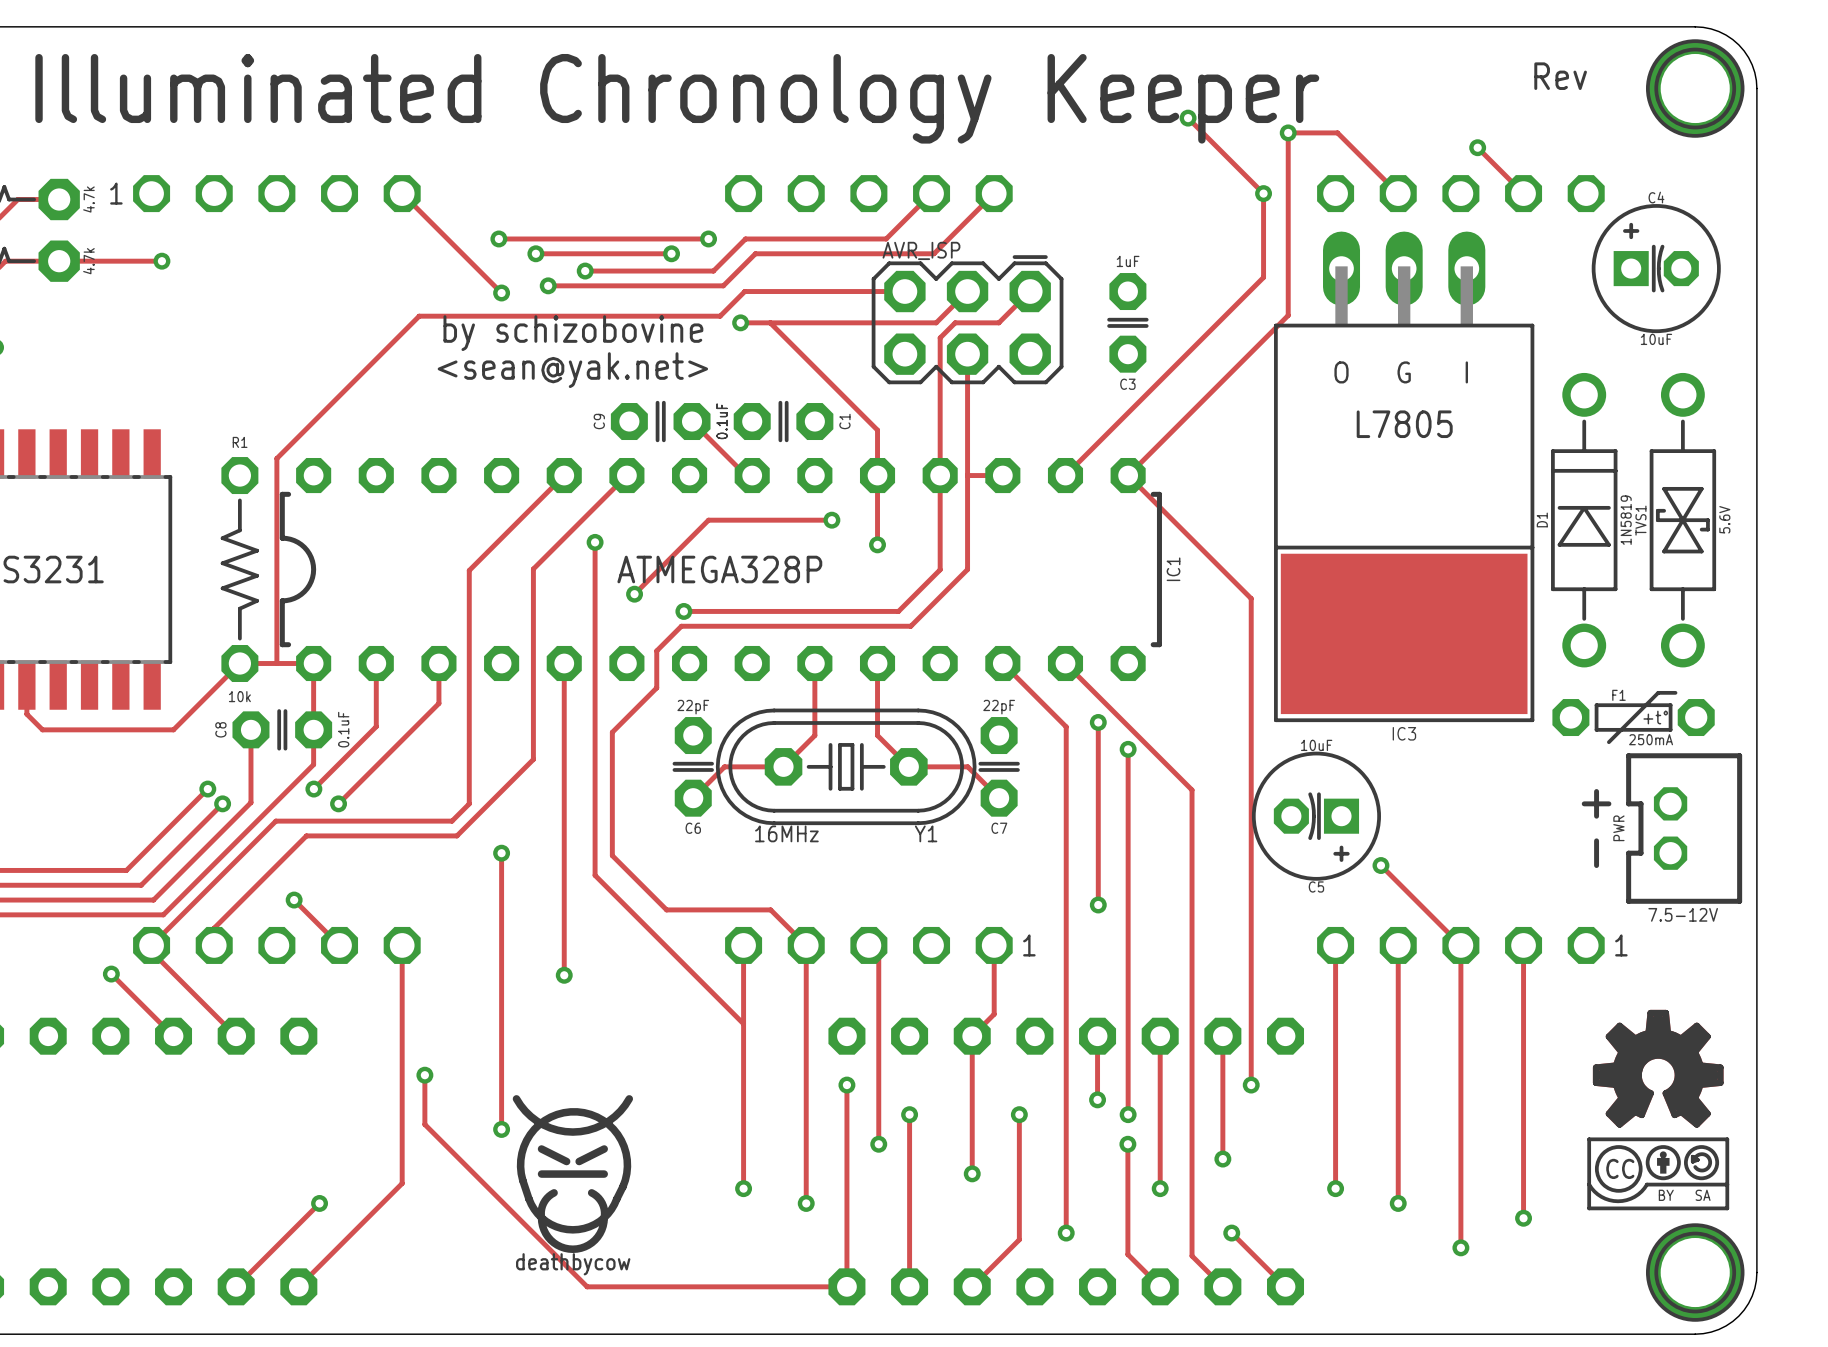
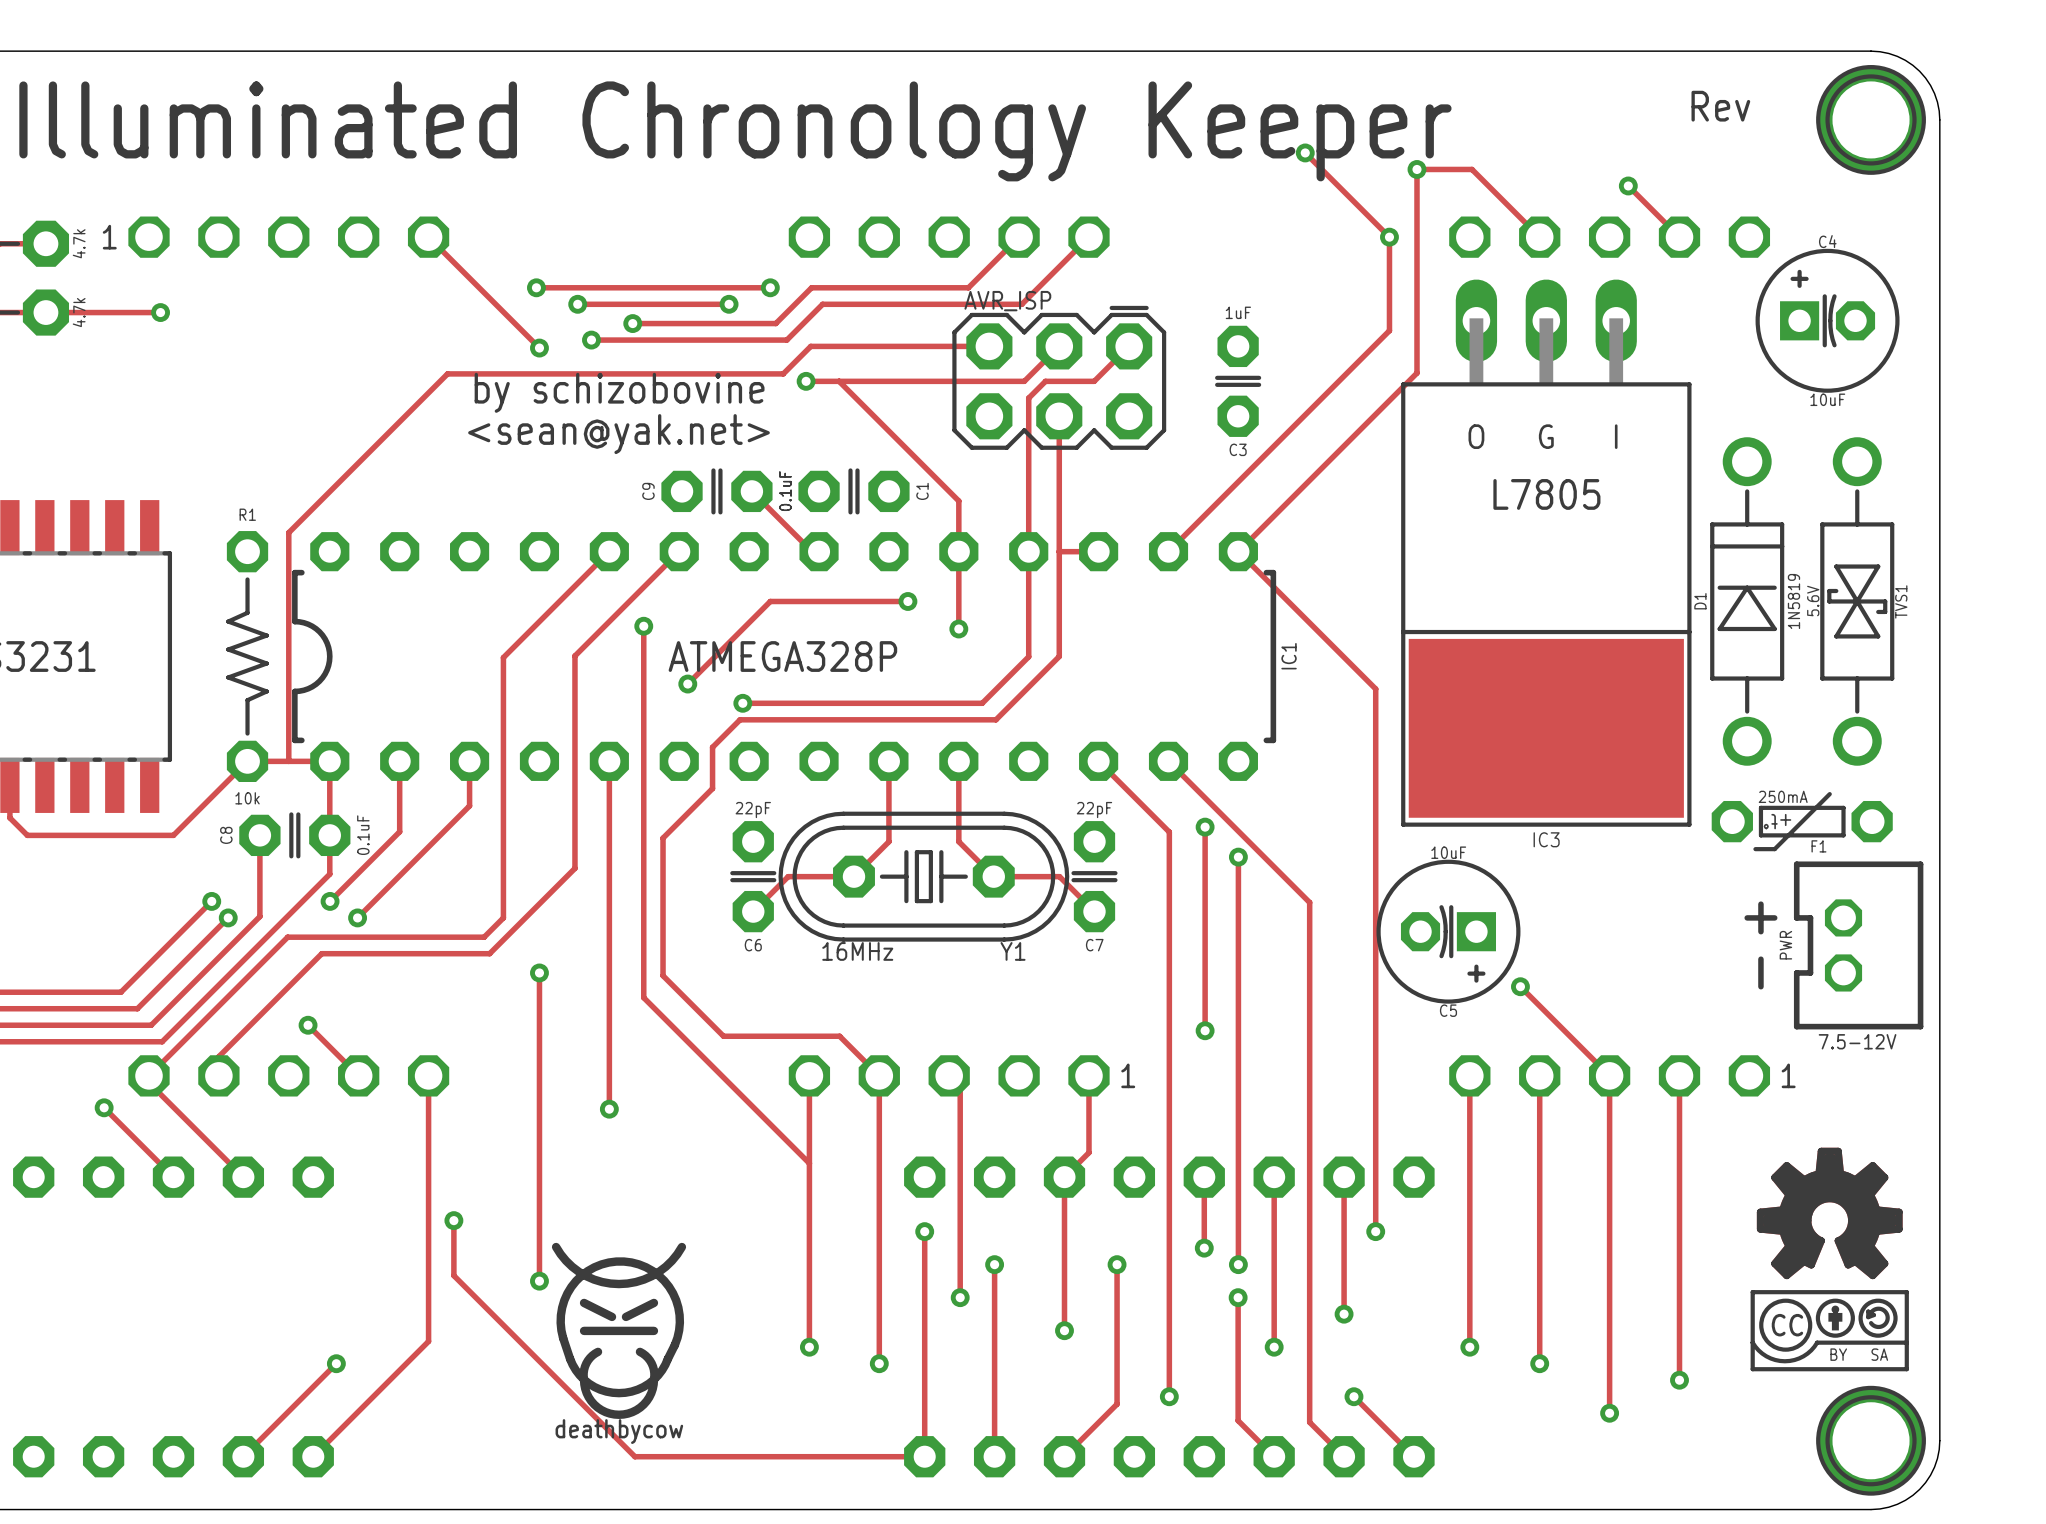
TVS1 value position: 5.6V (1724, 519) -> 5.6V (1813, 601)
TVS1 name position: TVS1 (1640, 520) -> TVS1 (1901, 601)
F1 rotation: 0° (1633, 717) -> 180° (1802, 821)

